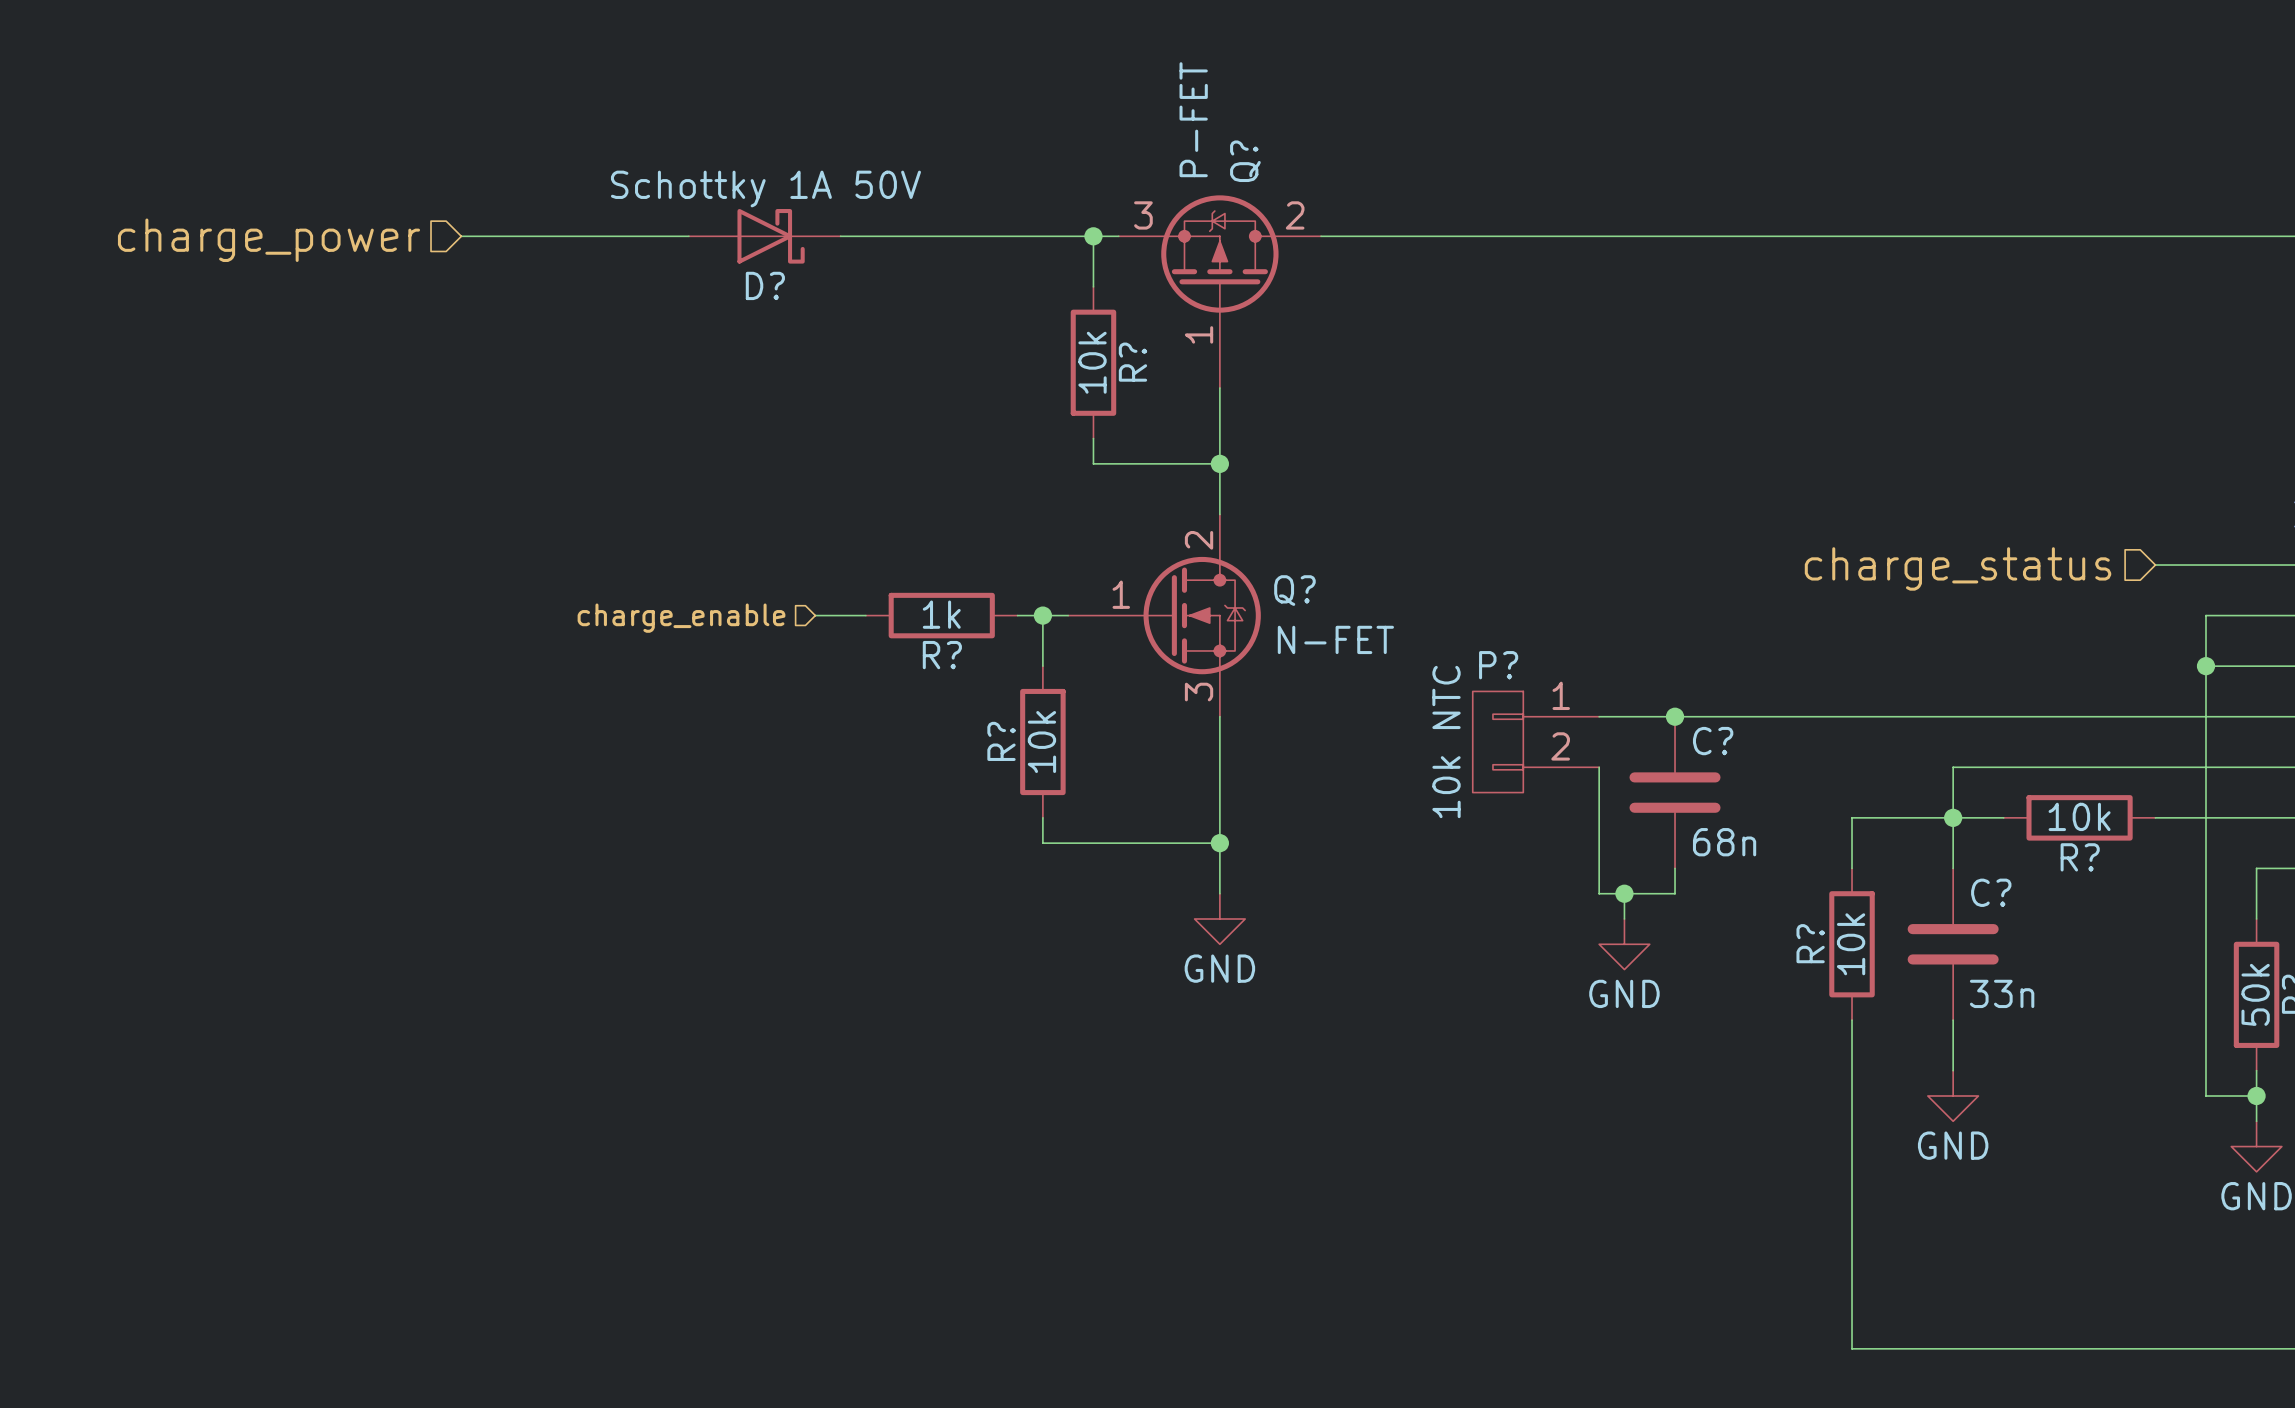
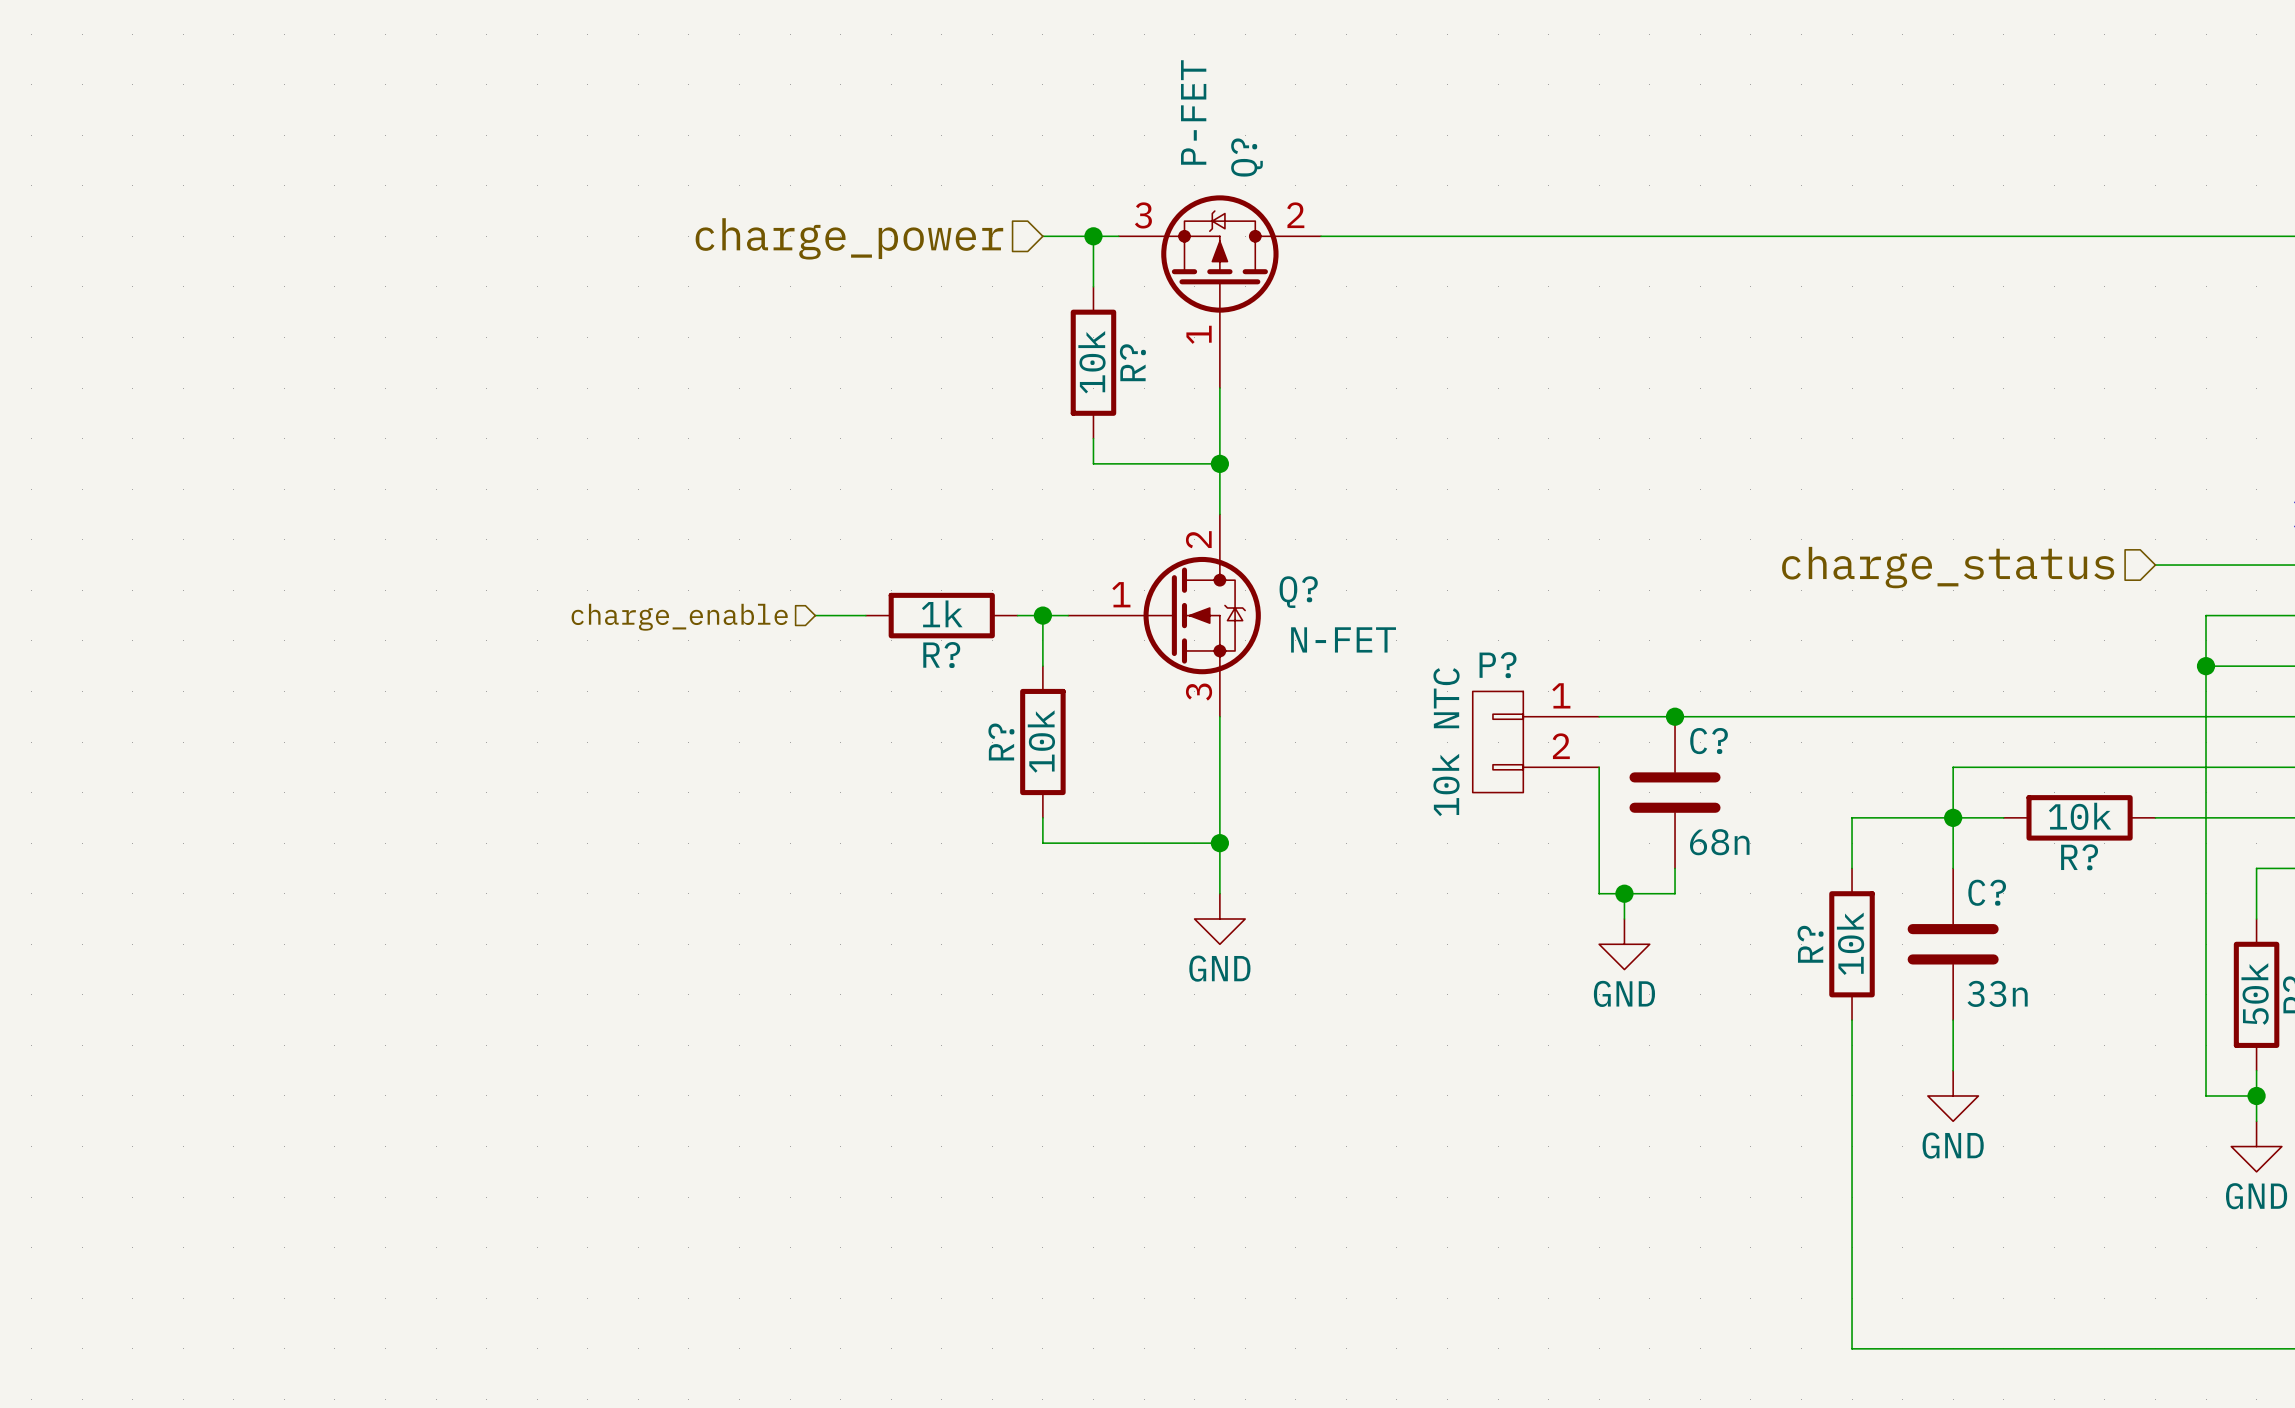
wire: (461, 236) (688, 236) -> none
D?: Schottky 1A 50V (764, 236) -> none
wire: (840, 236) (1042, 236) -> none
hierarchical label: charge_power (268, 240) -> none
hierarchical label: none -> charge_power (849, 238)

